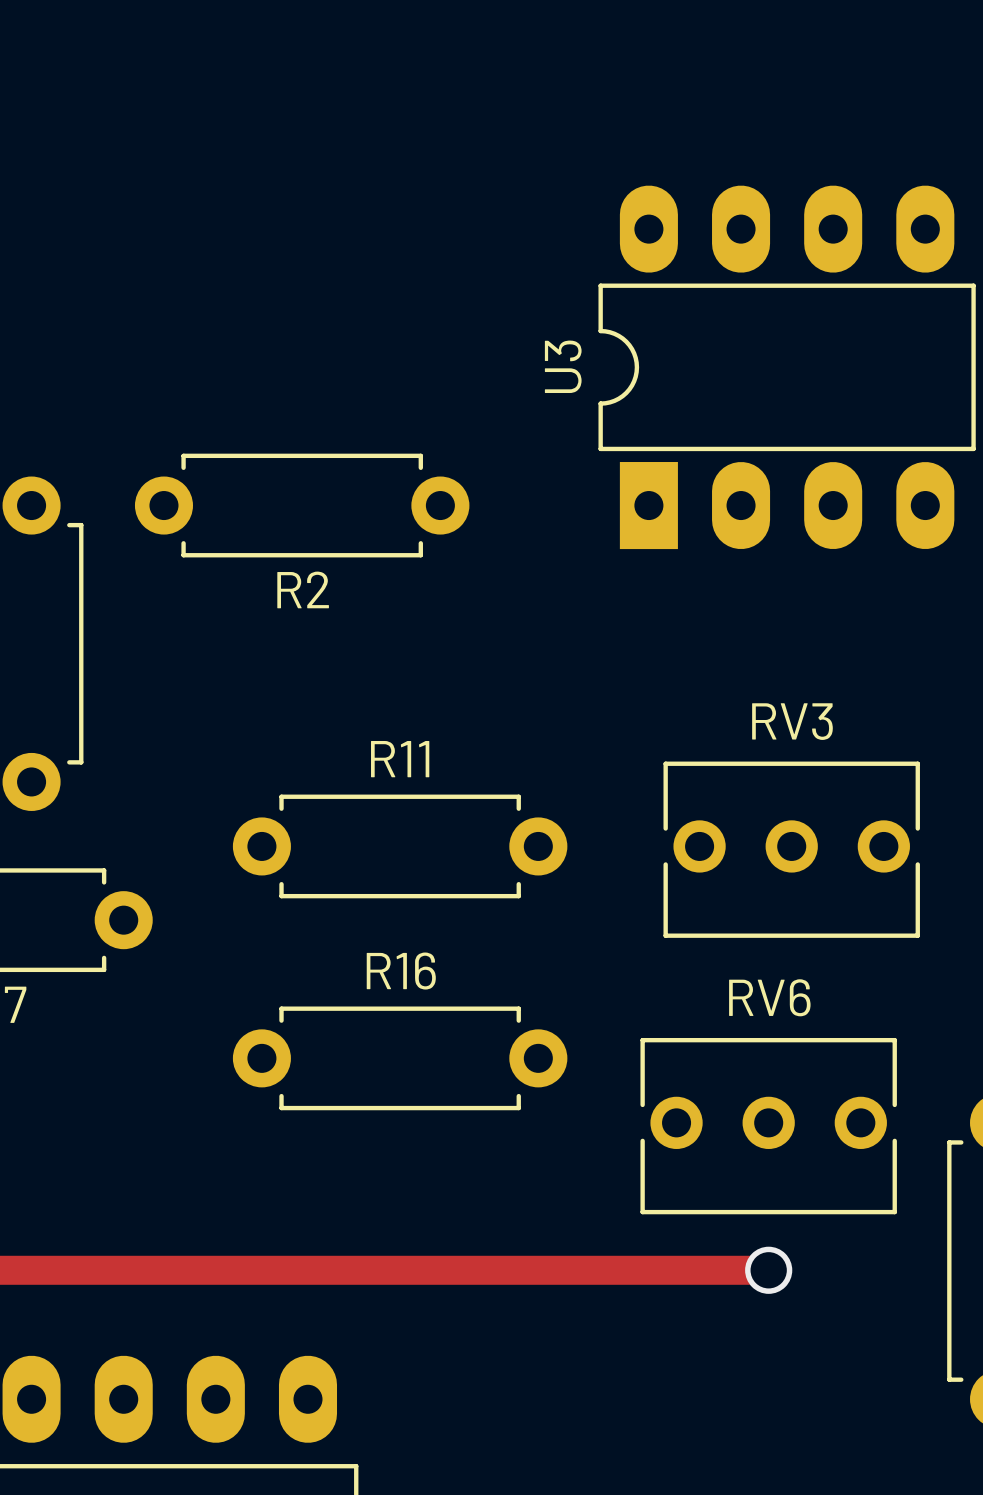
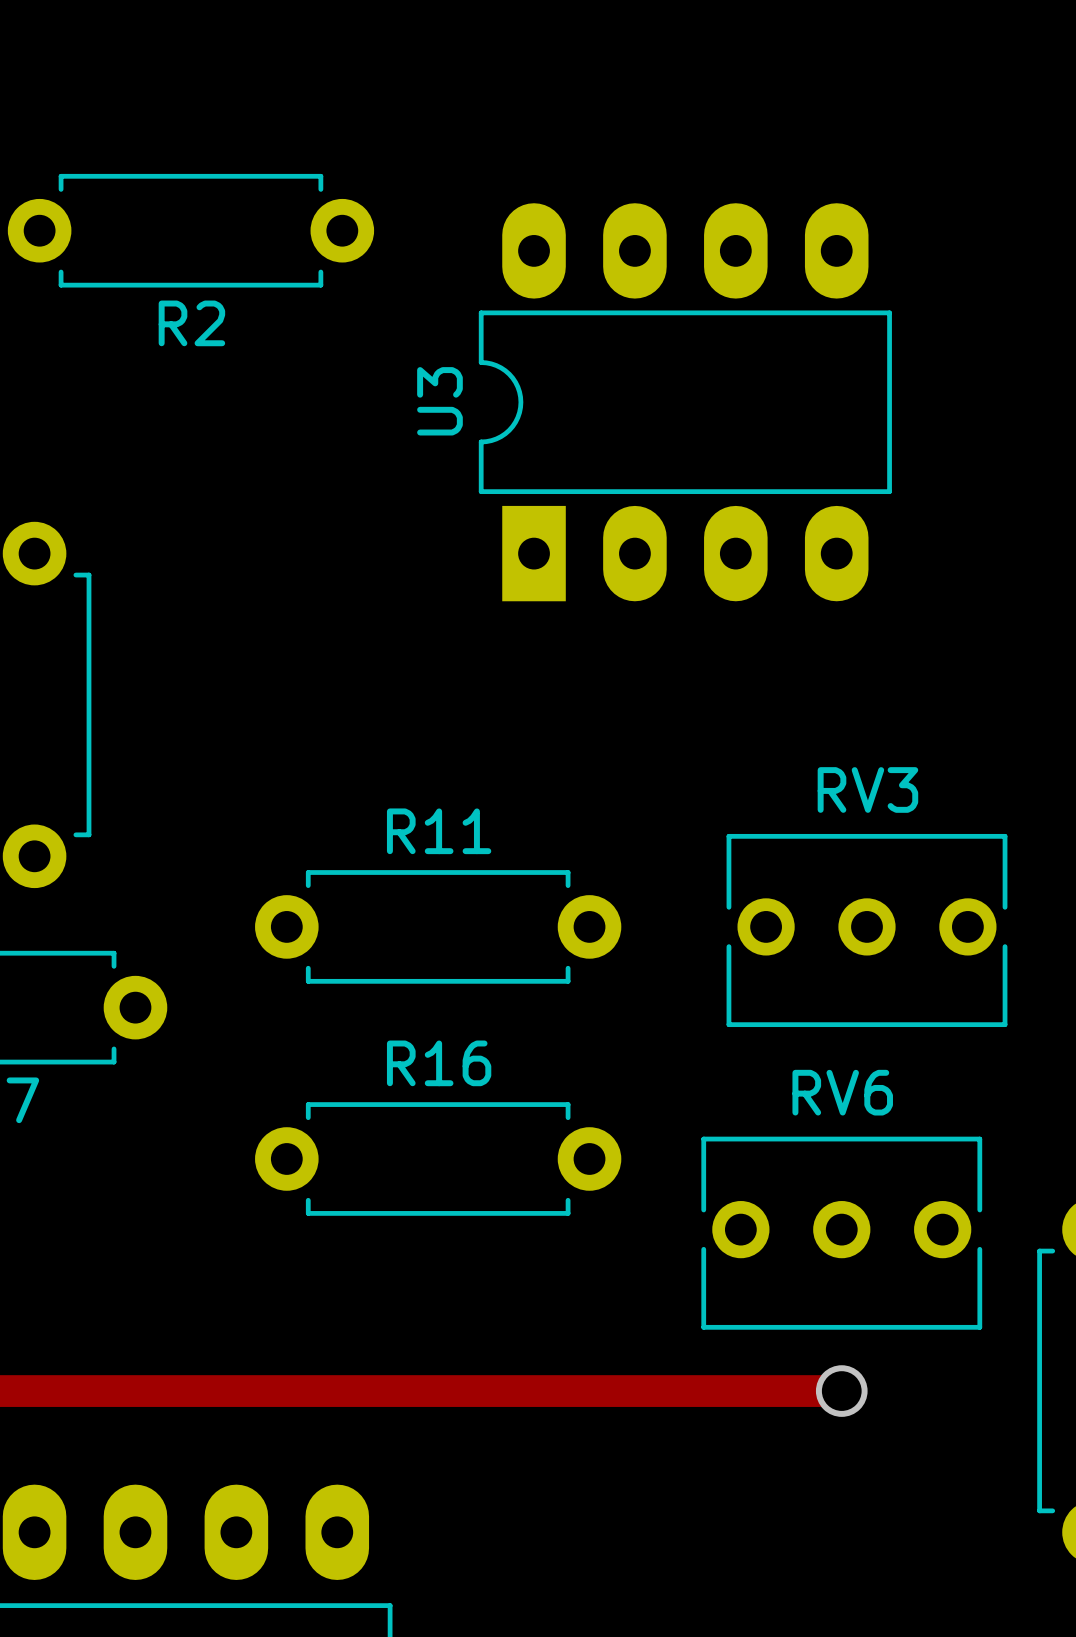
U3 position: (787, 367) -> (685, 402)
R2 position: (302, 505) -> (190, 230)

